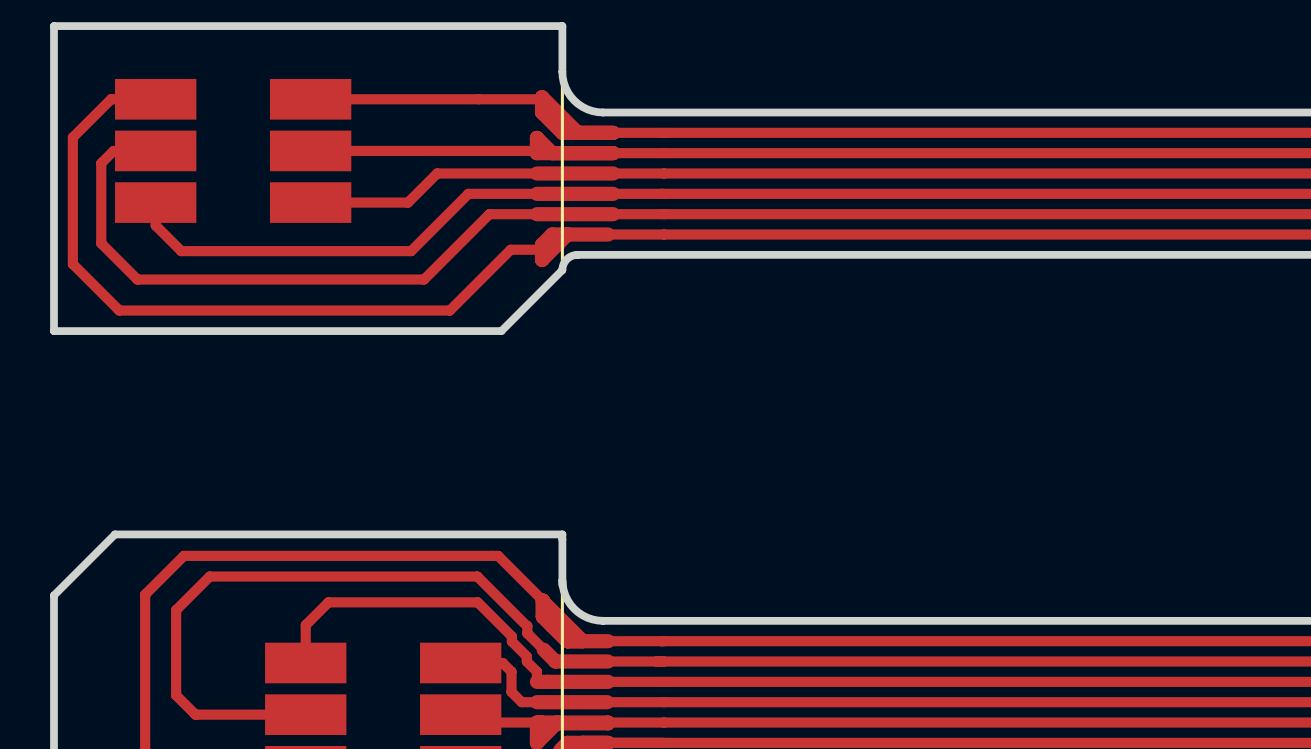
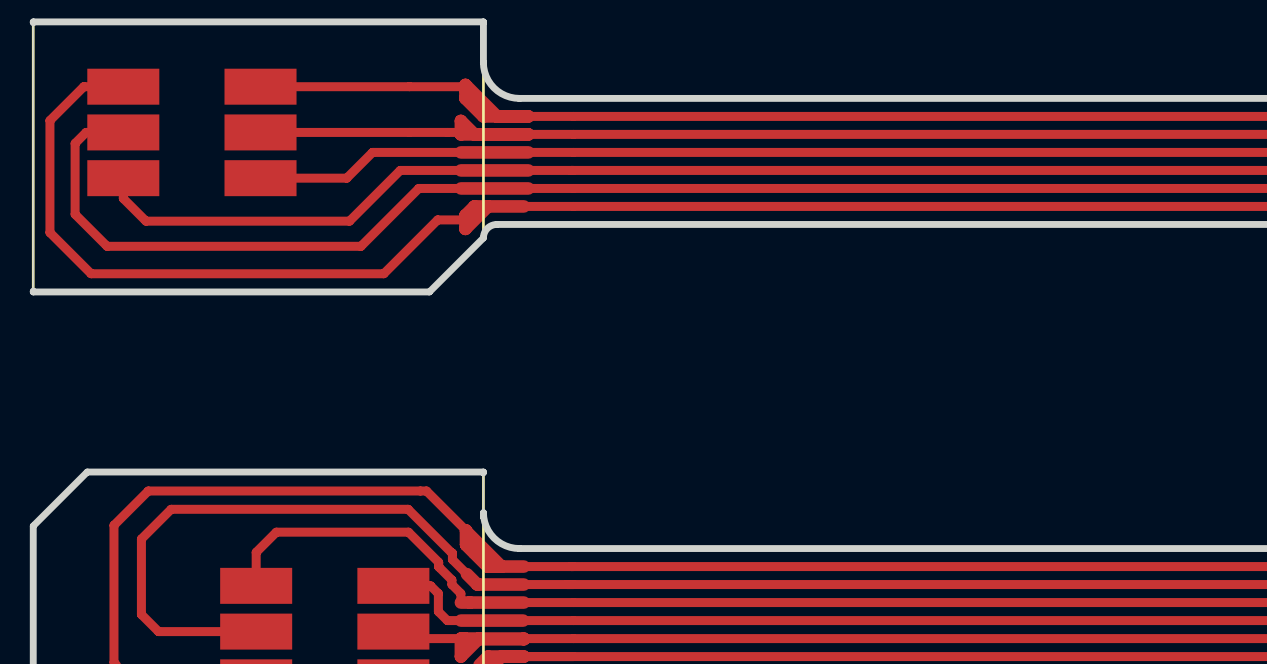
board edge width: thick (53, 27) (53, 330) -> thin (33, 22) (33, 291)
board edge width: thick (562, 535) (562, 580) -> thin (483, 472) (483, 513)

